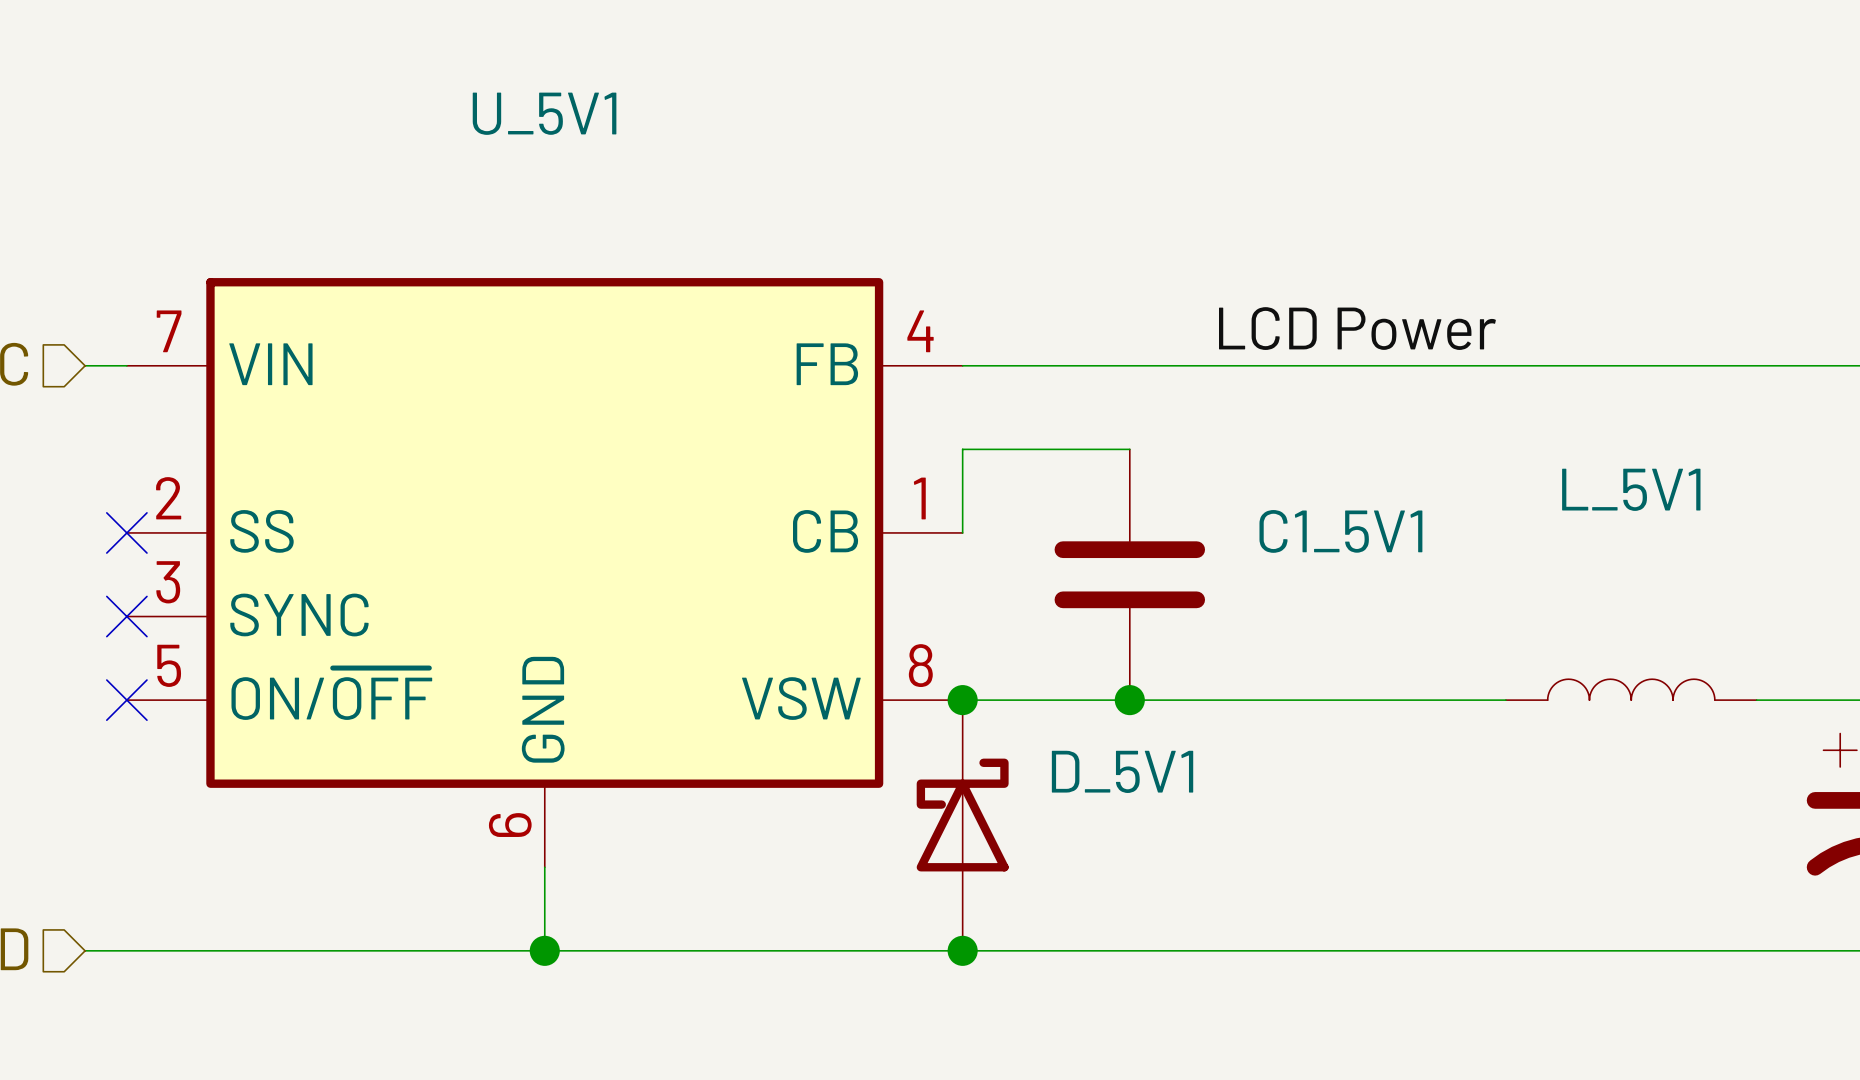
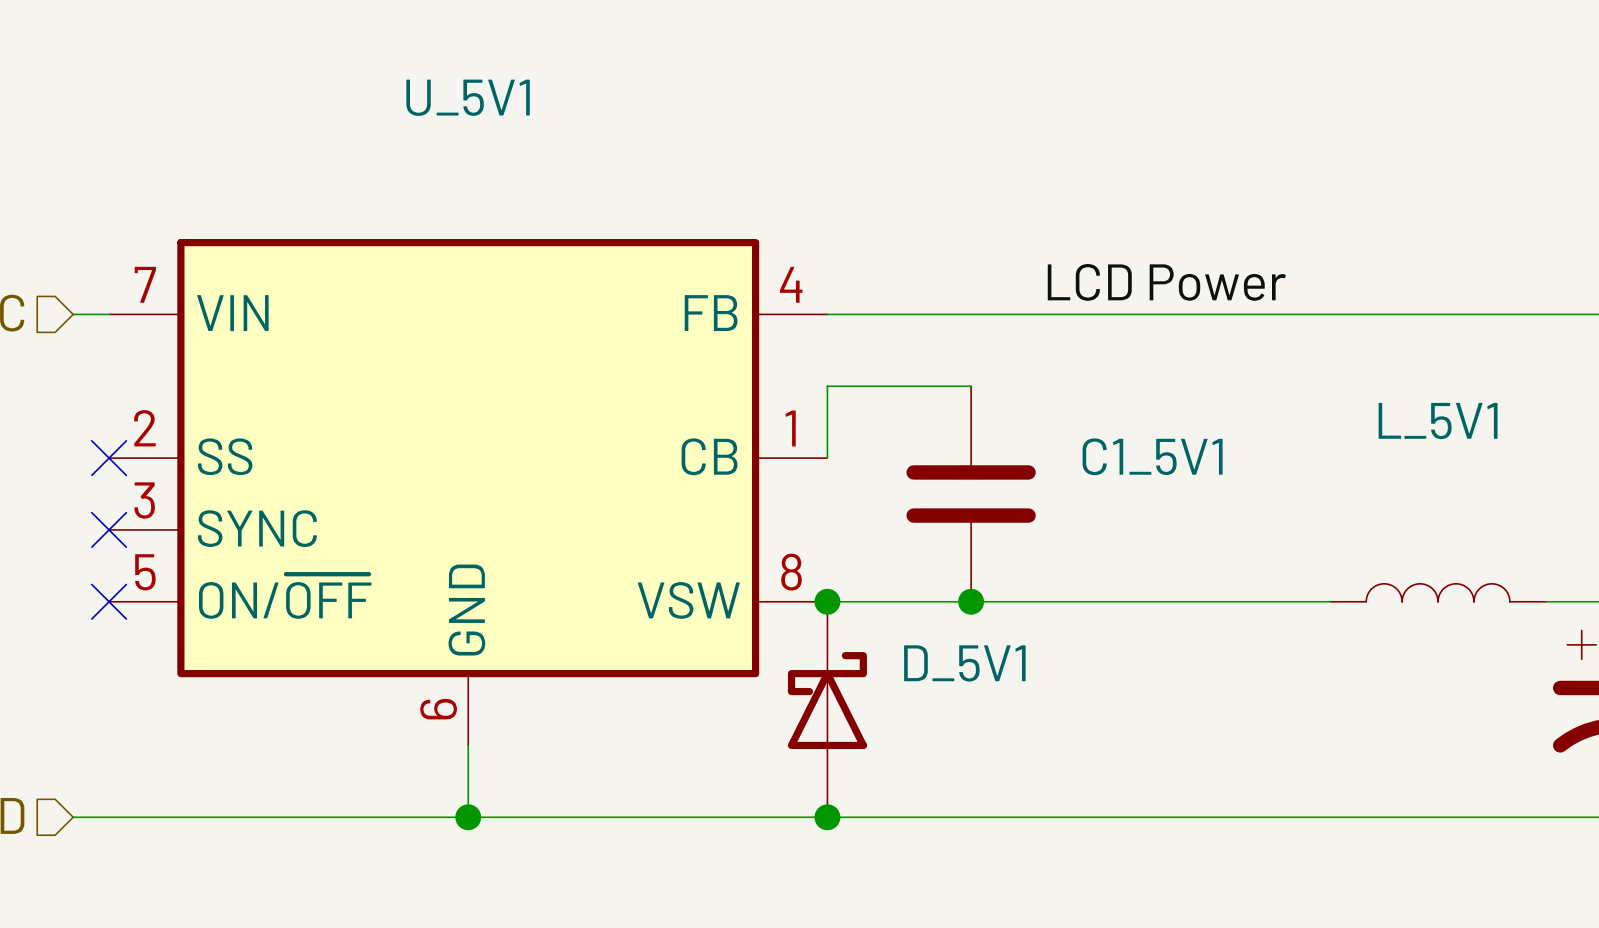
L_5V1 position: (1631, 689) -> (1438, 592)

